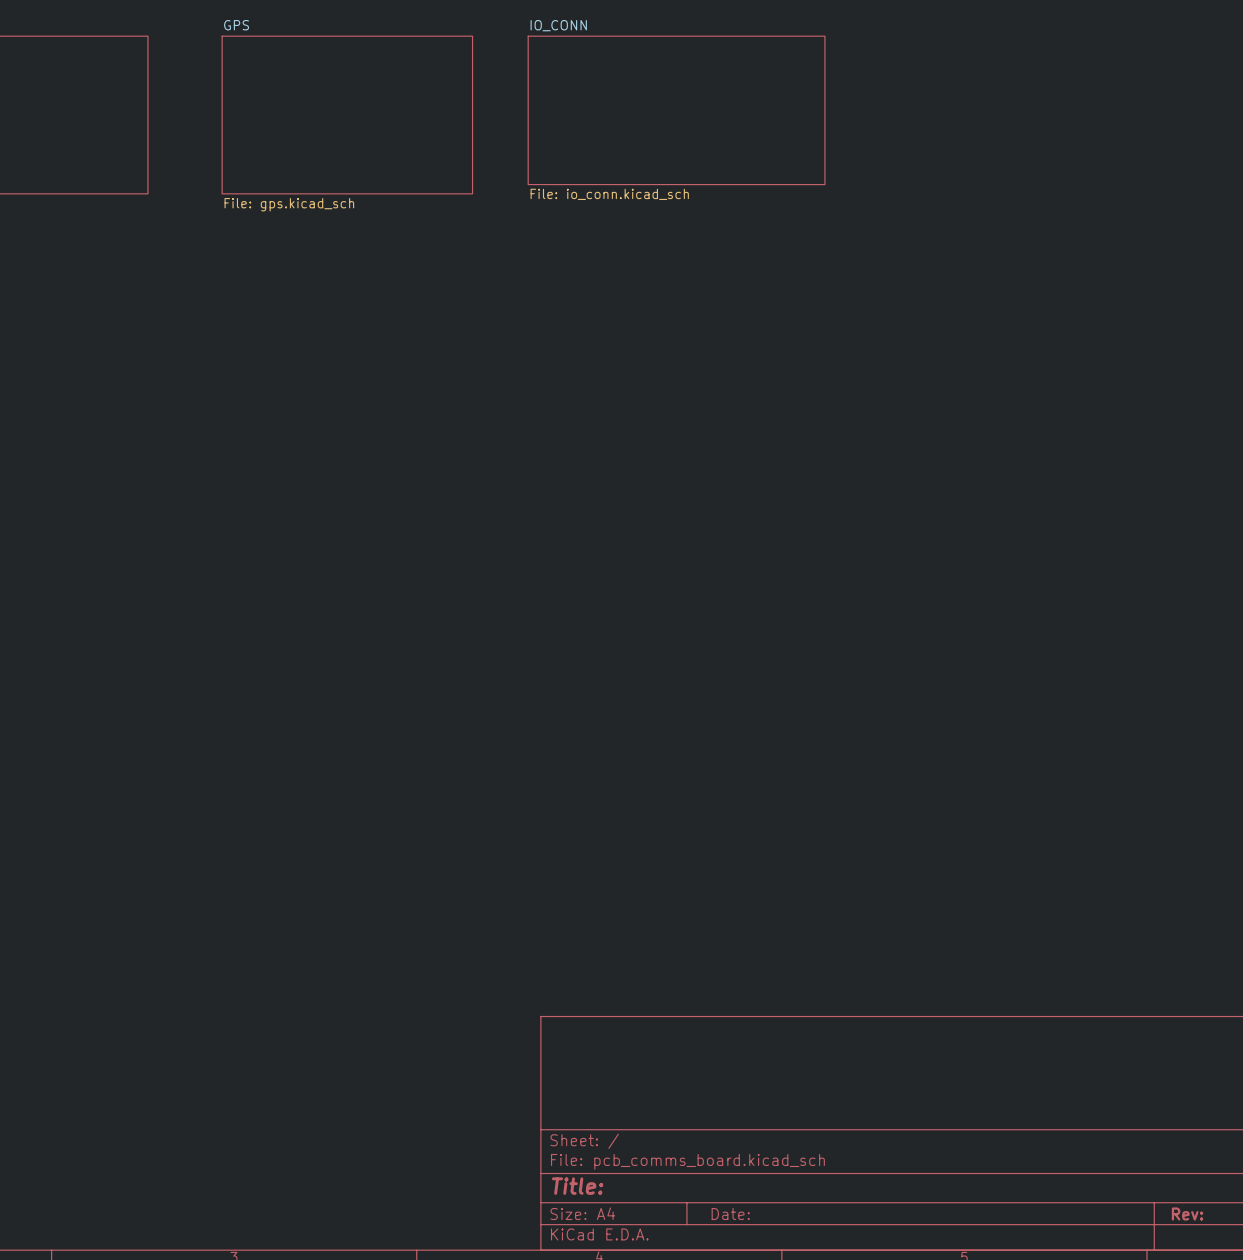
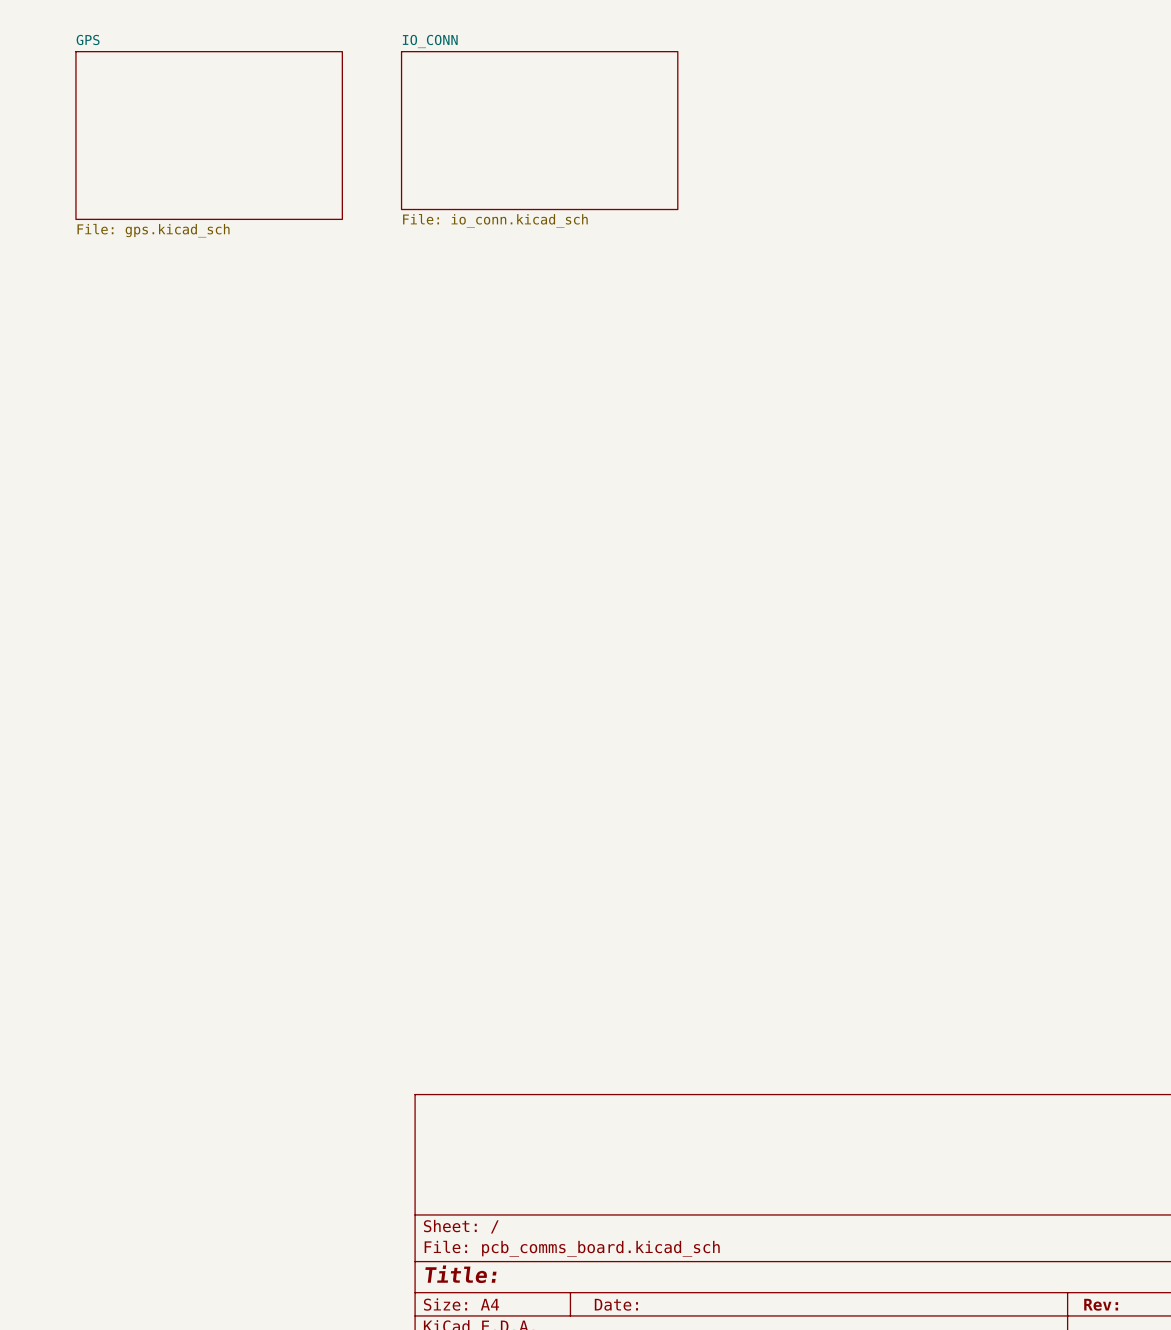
sheet IO_CONN: none -> File: io_conn.kicad_sch (539, 130)
sheet IO_CONN: File: io_conn.kicad_sch (676, 110) -> none

